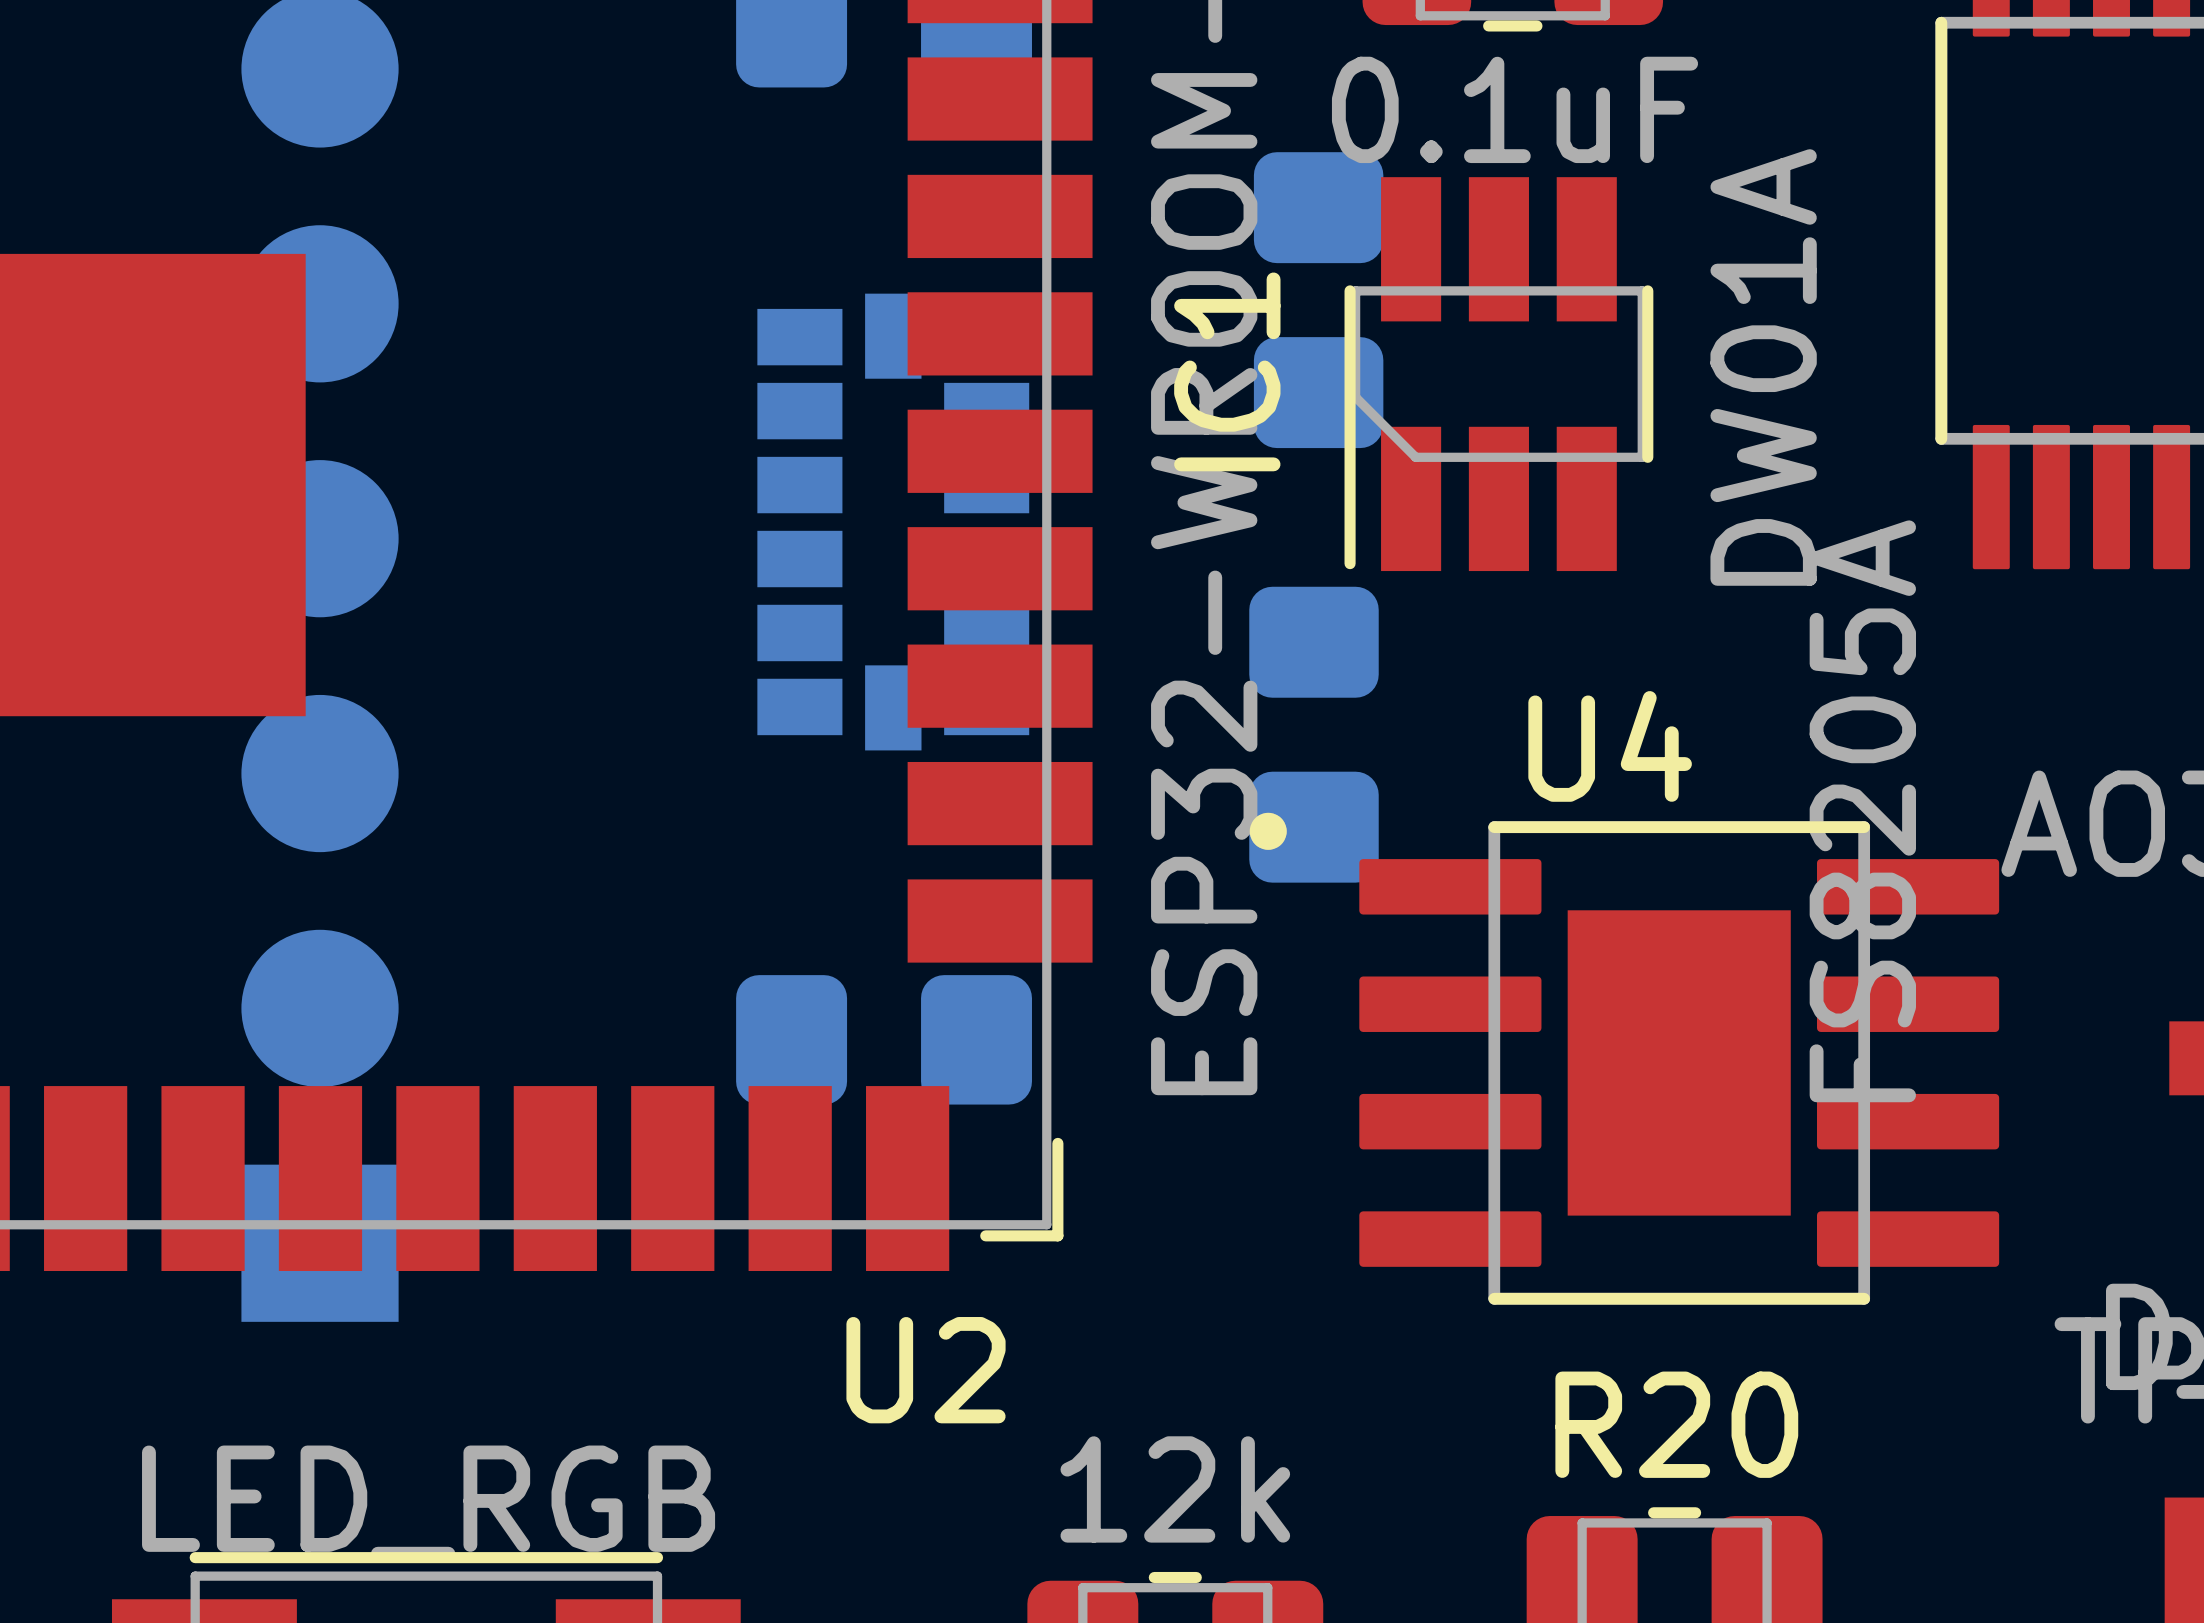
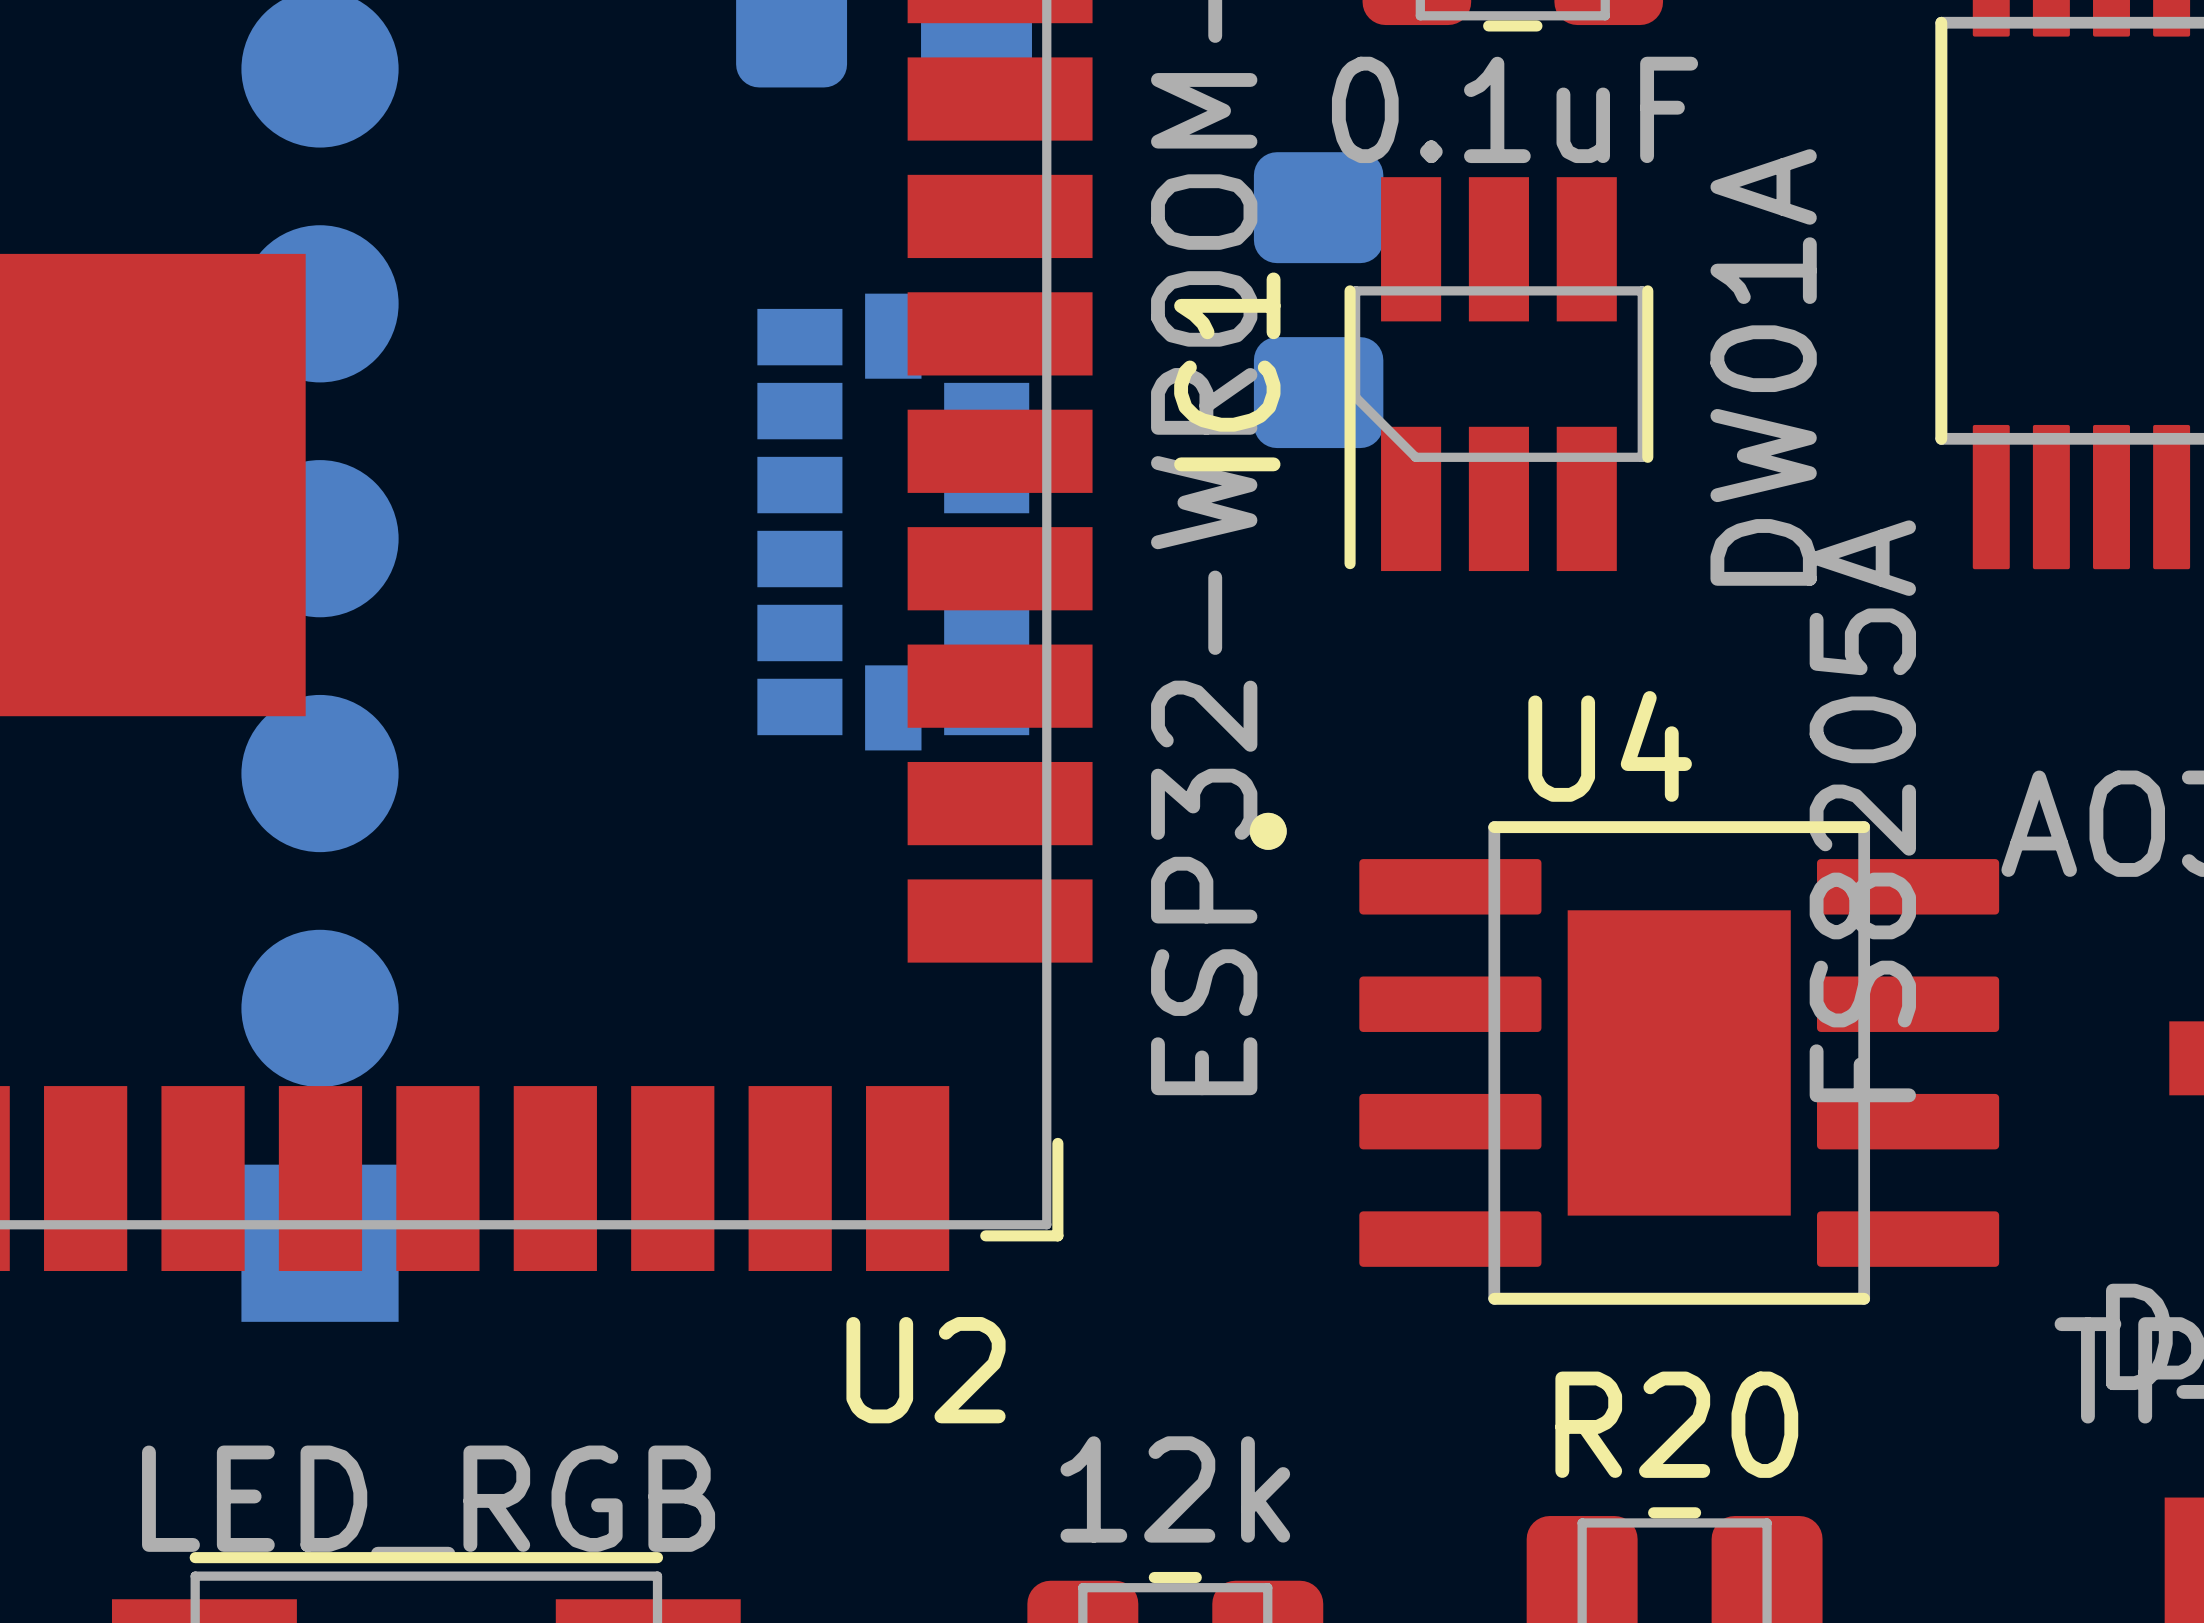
part: (1314, 734) -> none
part: (884, 1039) -> none

